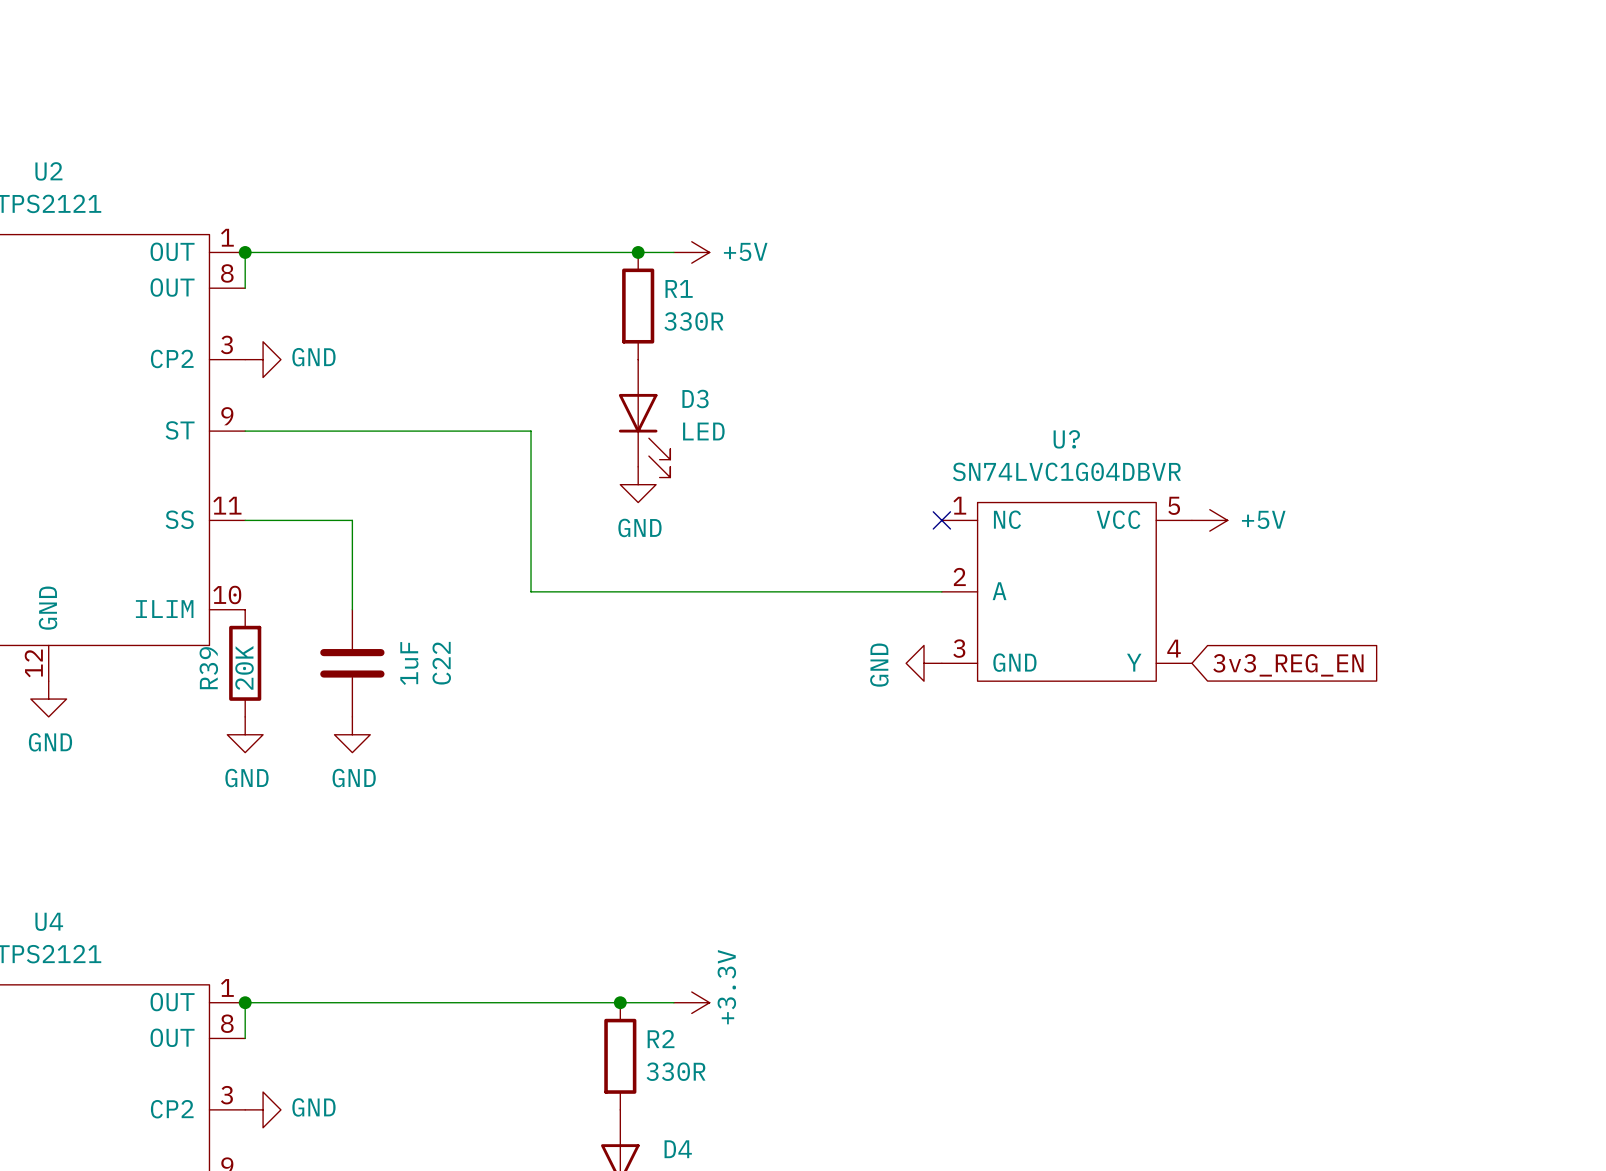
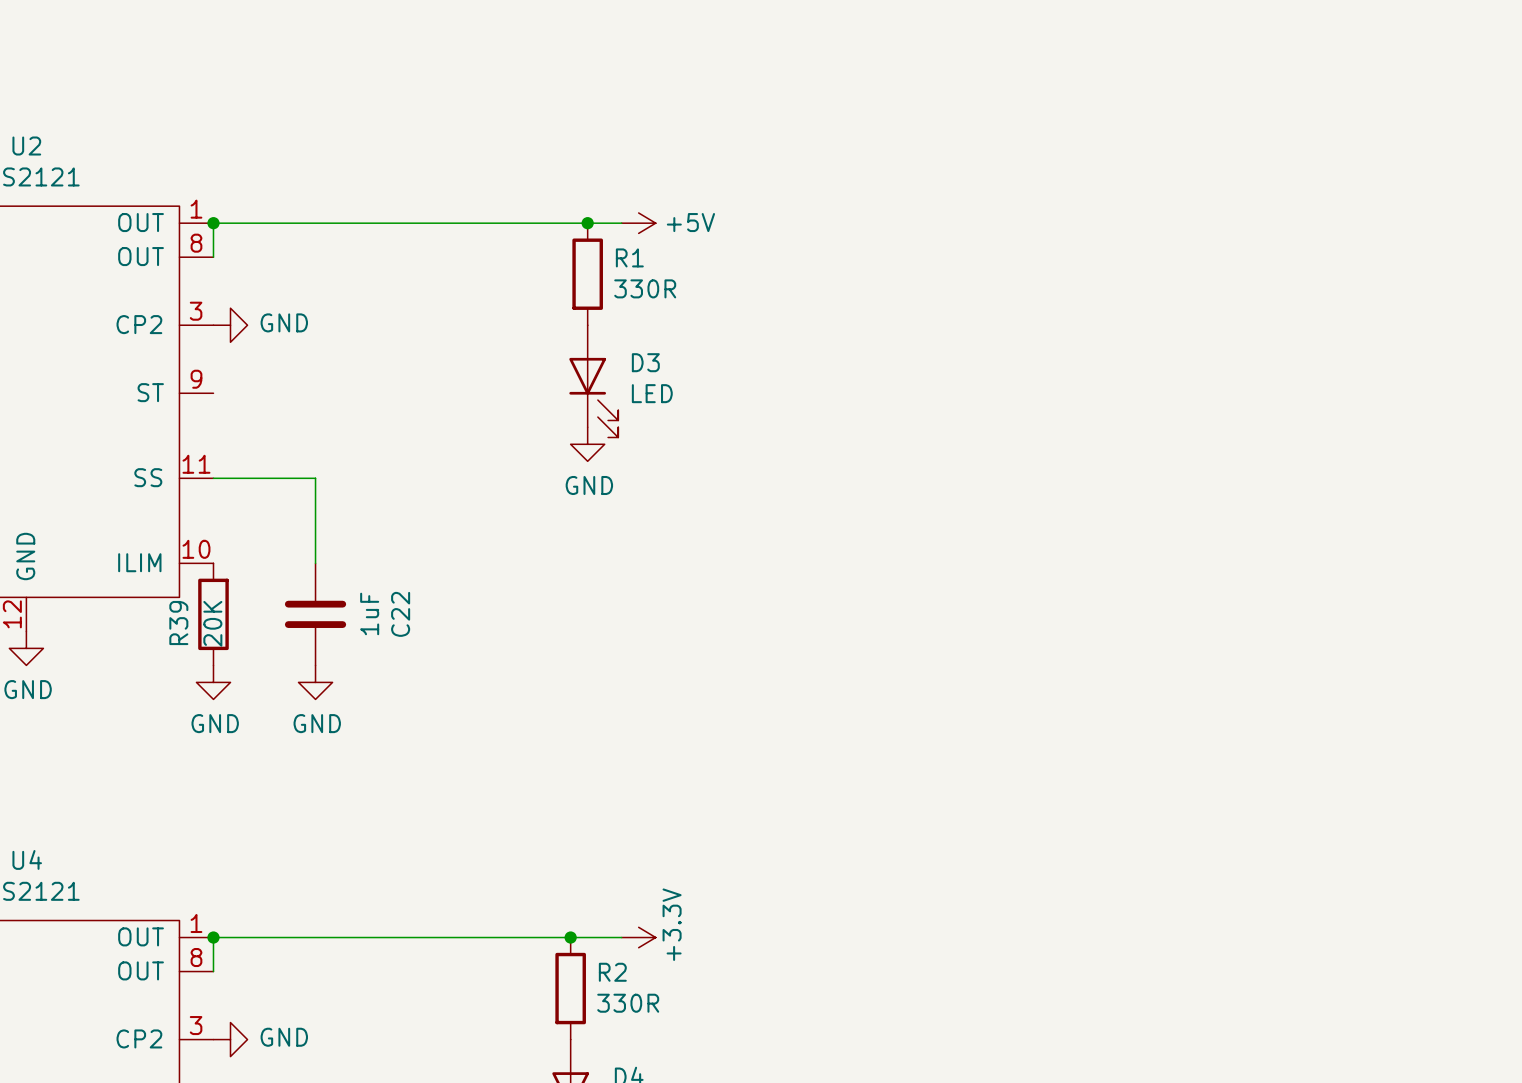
wire: (245, 431) (531, 431) (531, 591) (941, 591) -> none
no-connect mark: (941, 520) -> none
power symbol: +5V (1209, 520) -> none
U?: SN74LVC1G04DBVR (1066, 591) -> none
power symbol: GND (924, 663) -> none
global label: 3v3_REG_EN (1288, 665) -> none

